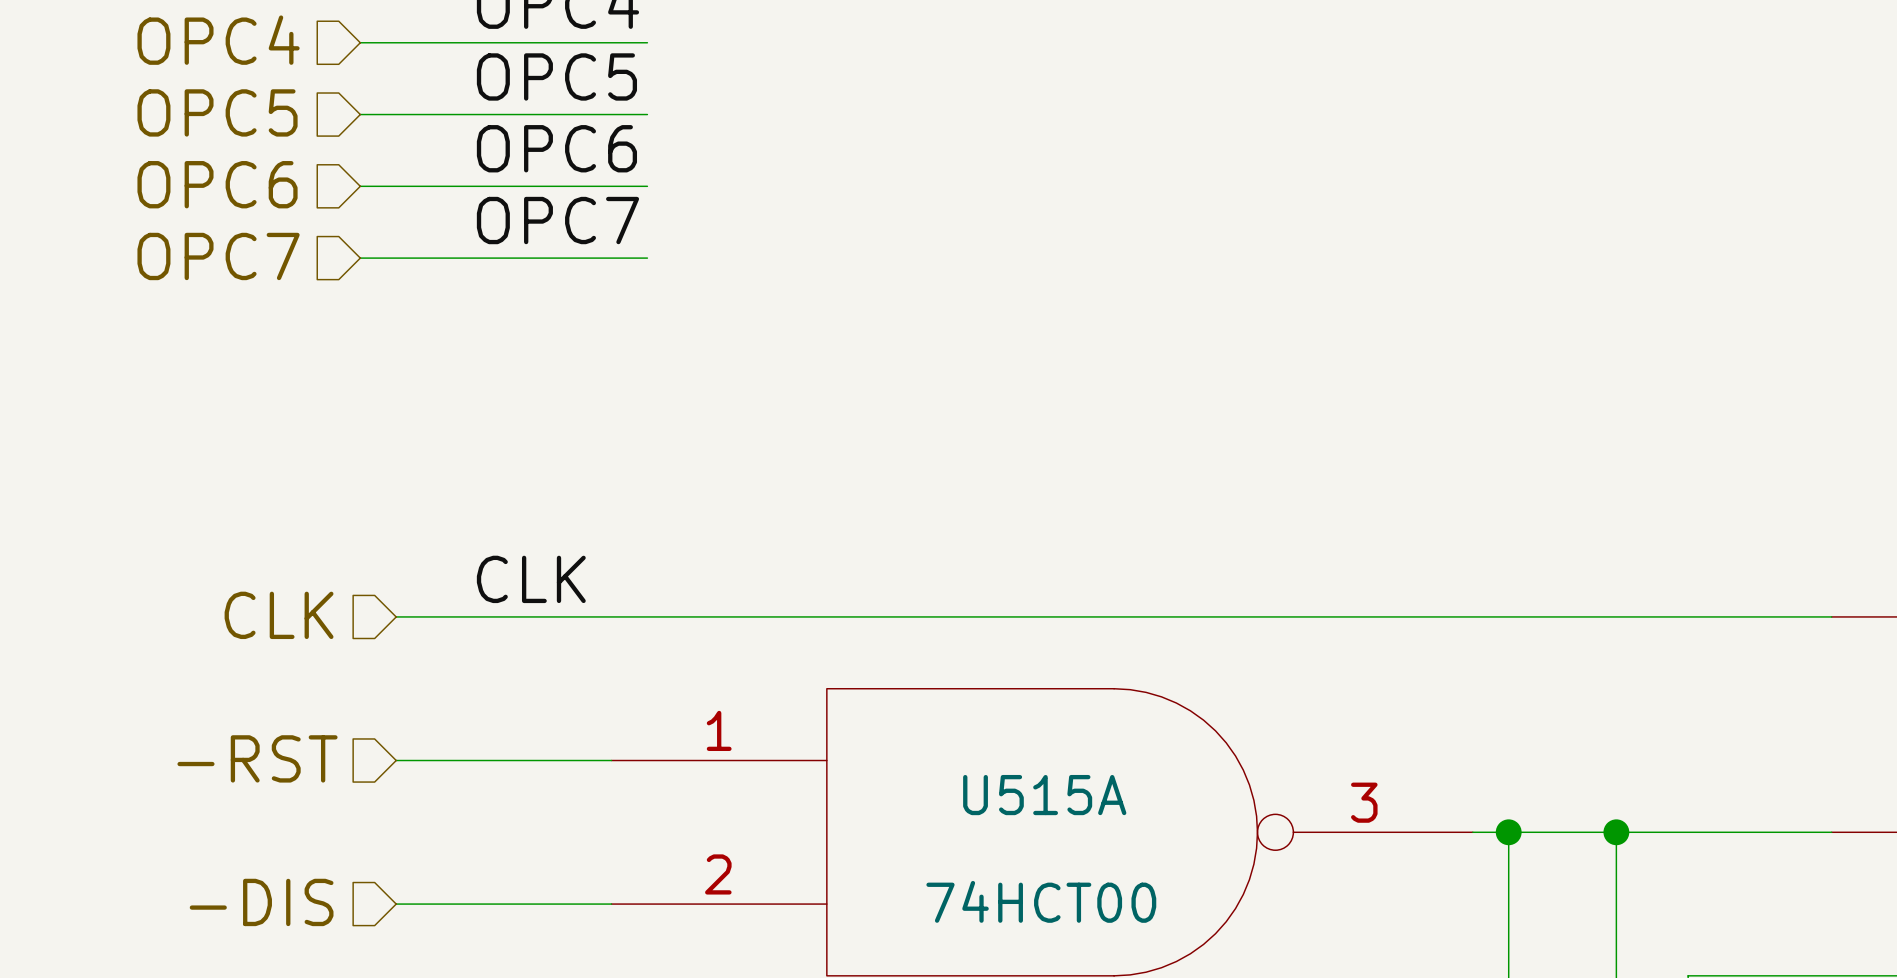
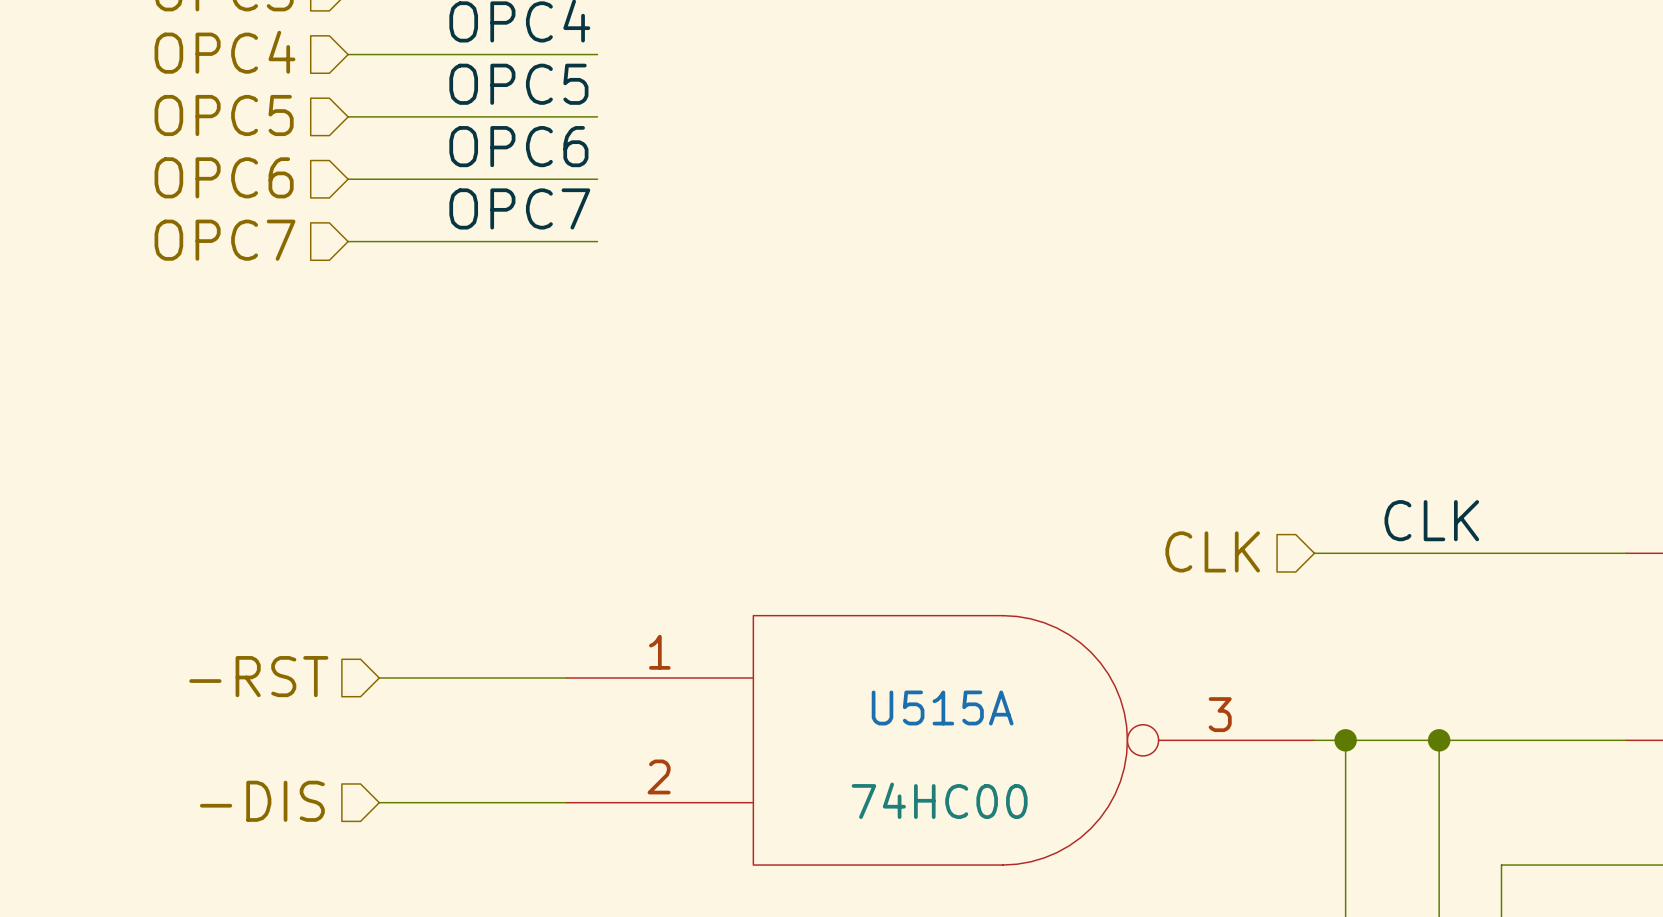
label: CLK (531, 579) -> none
label: none -> CLK (1431, 520)
hierarchical label: CLK (279, 615) -> none
hierarchical label: none -> CLK (1212, 551)
wire: (396, 616) (1472, 616) -> none
U515A value: 74HCT00 (1041, 901) -> 74HC00 (939, 800)

